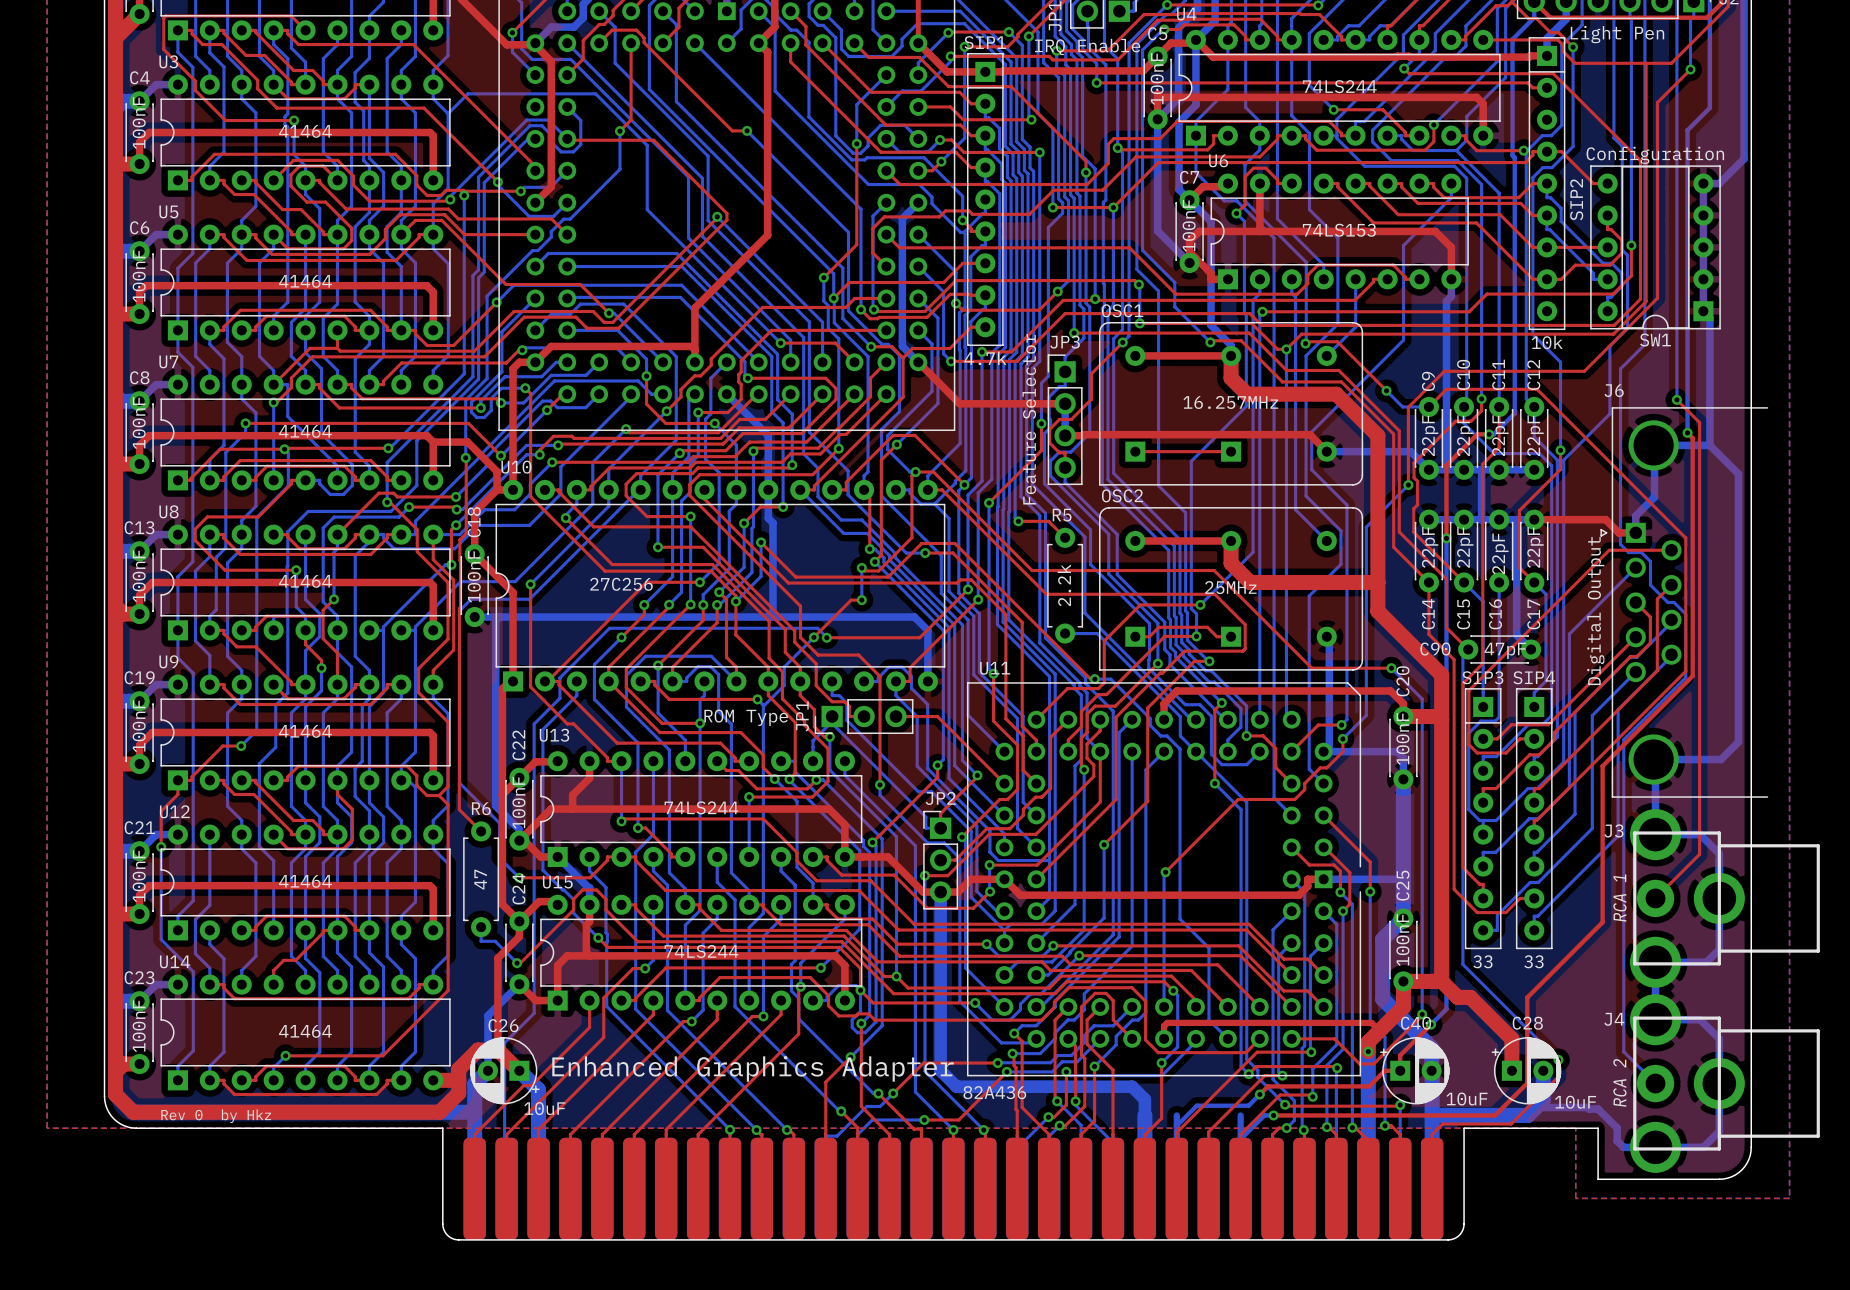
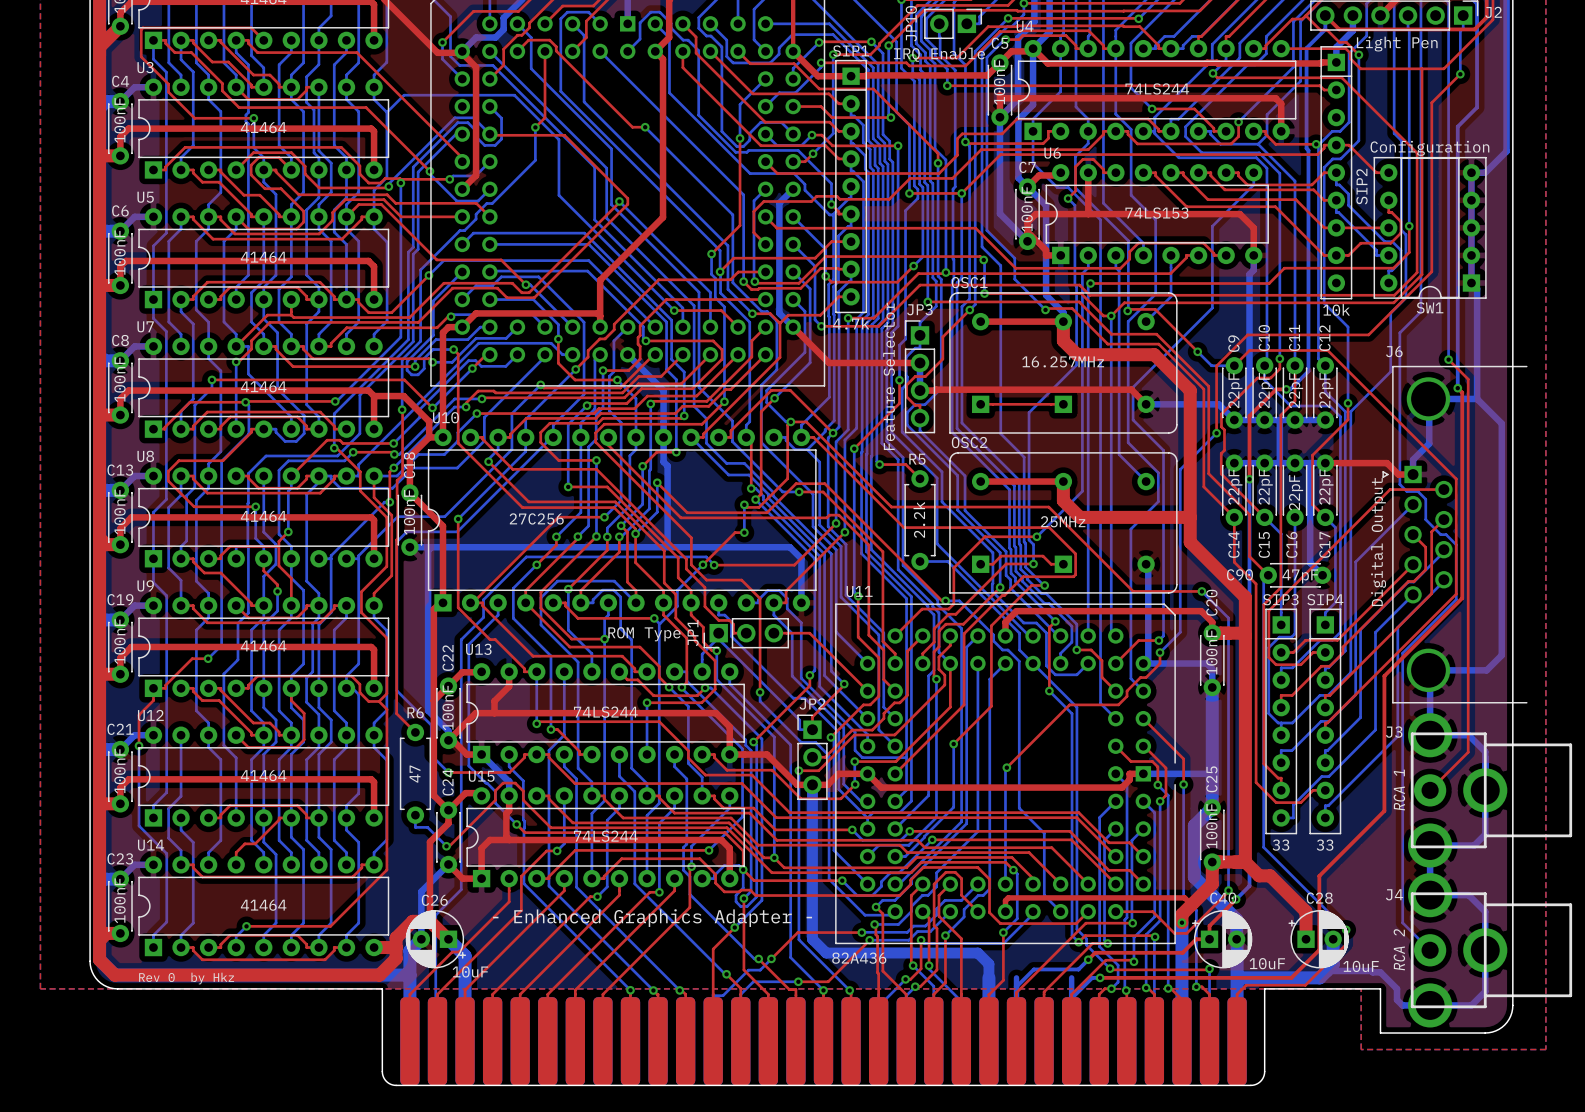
text: Enhanced Graphics Adapter (753, 1068) -> - Enhanced Graphics Adapter - (652, 918)

